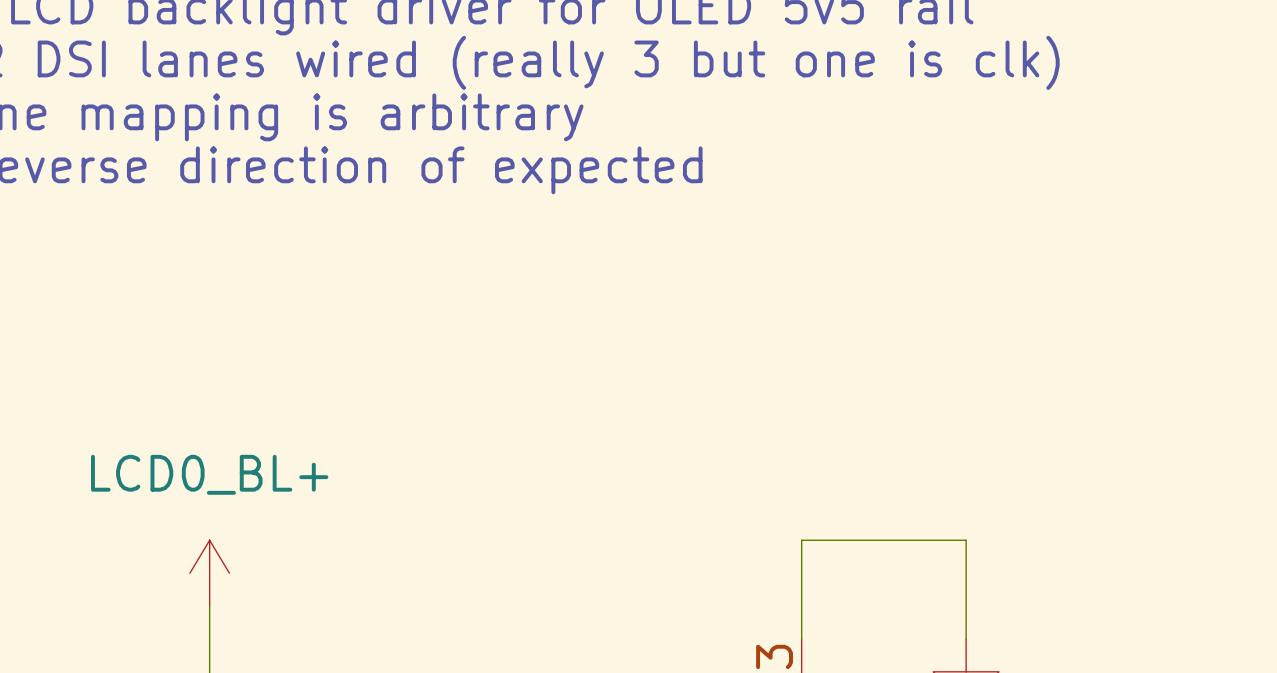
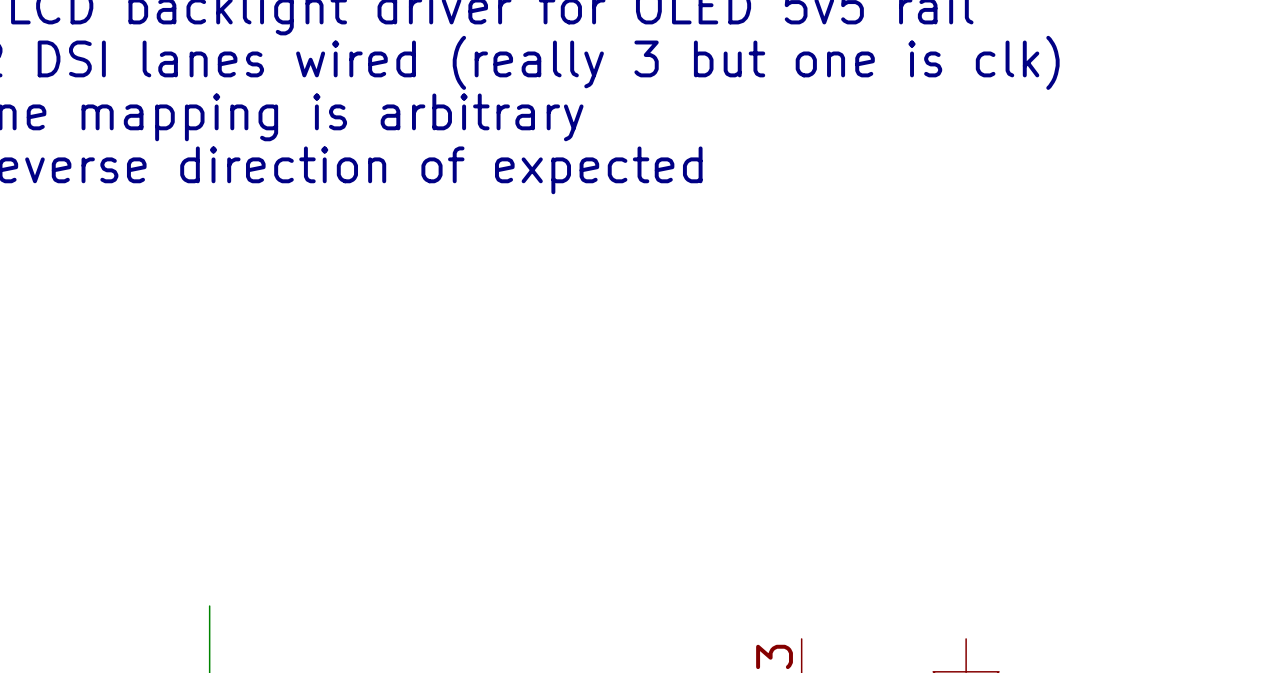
power symbol: LCD0_BL+ (209, 573) -> none
wire: (801, 638) (801, 540) (966, 540) (966, 638) -> none

